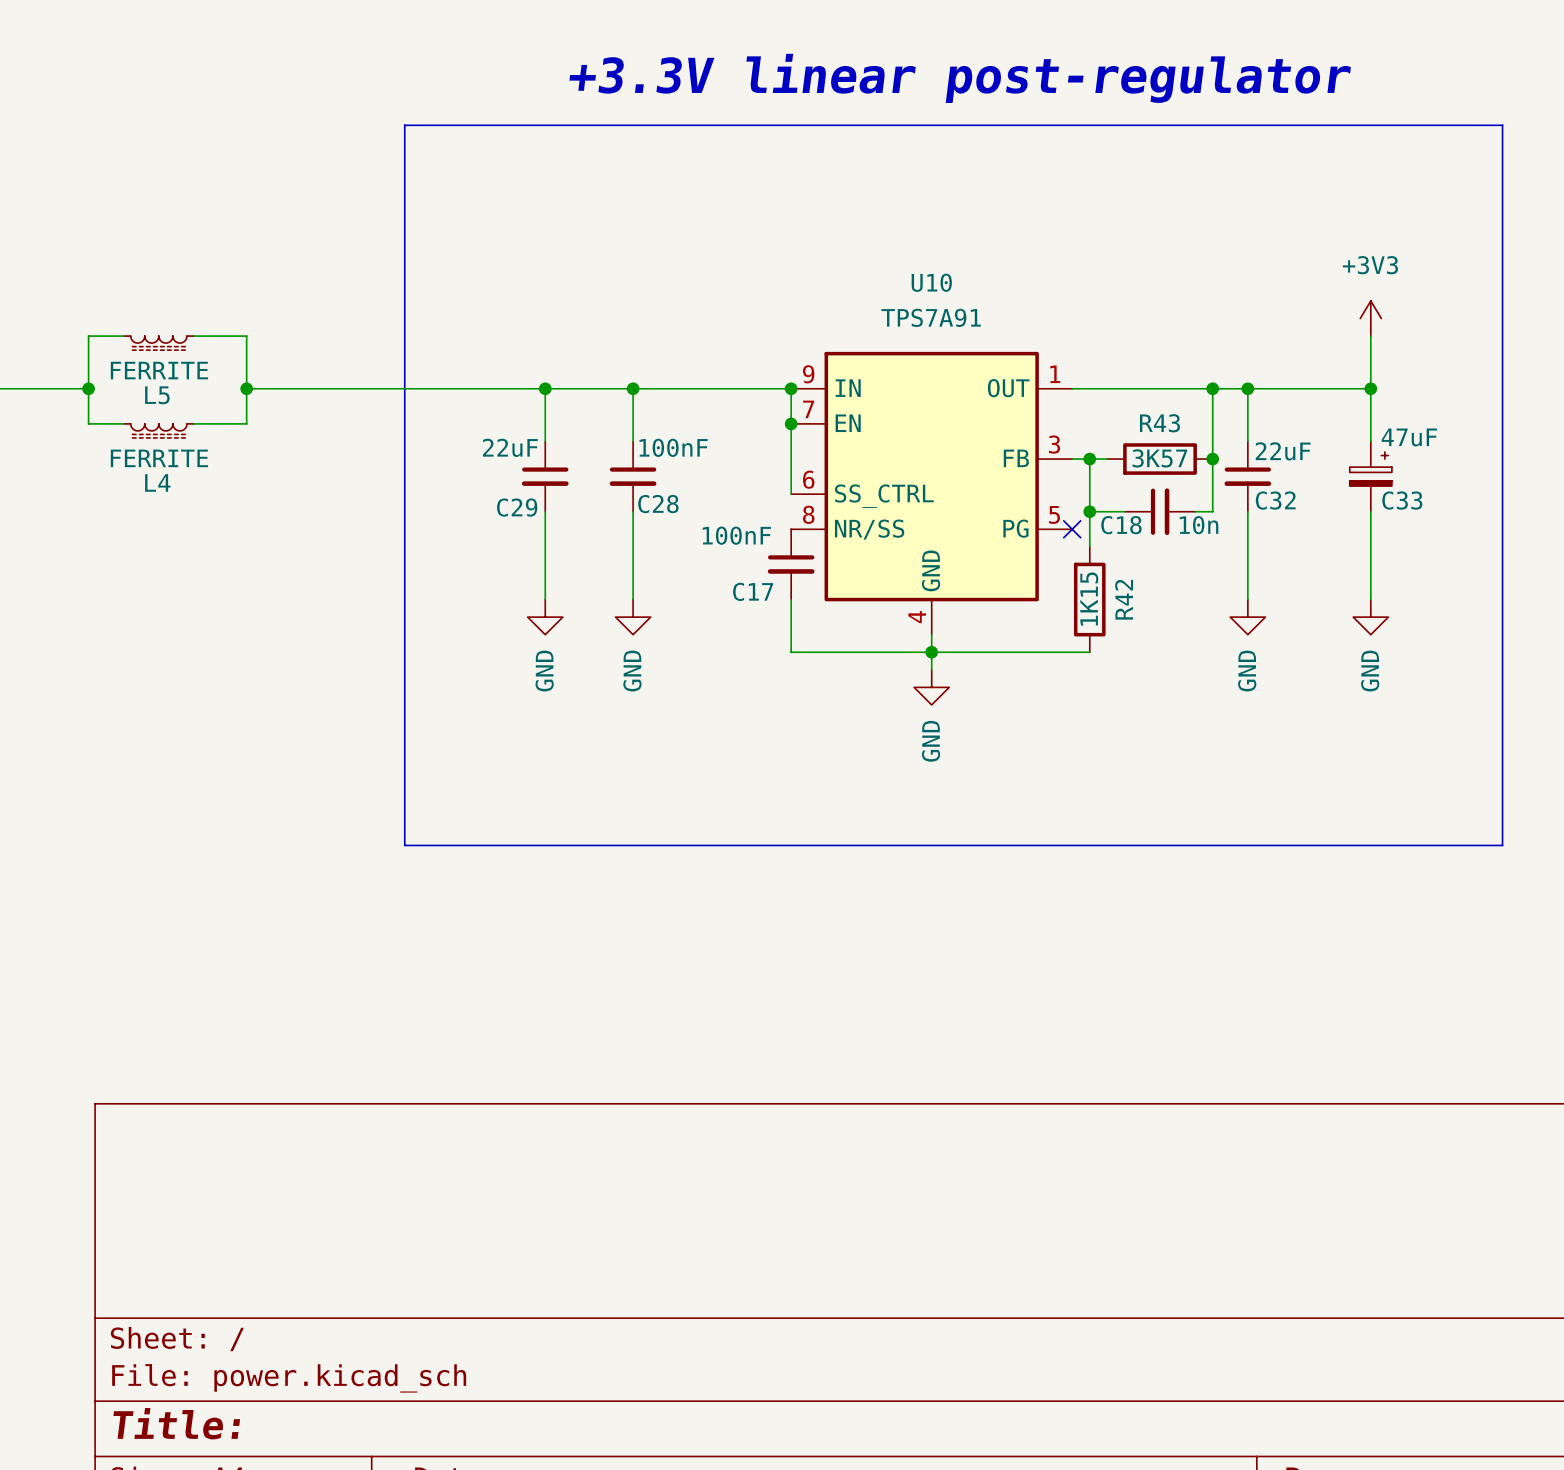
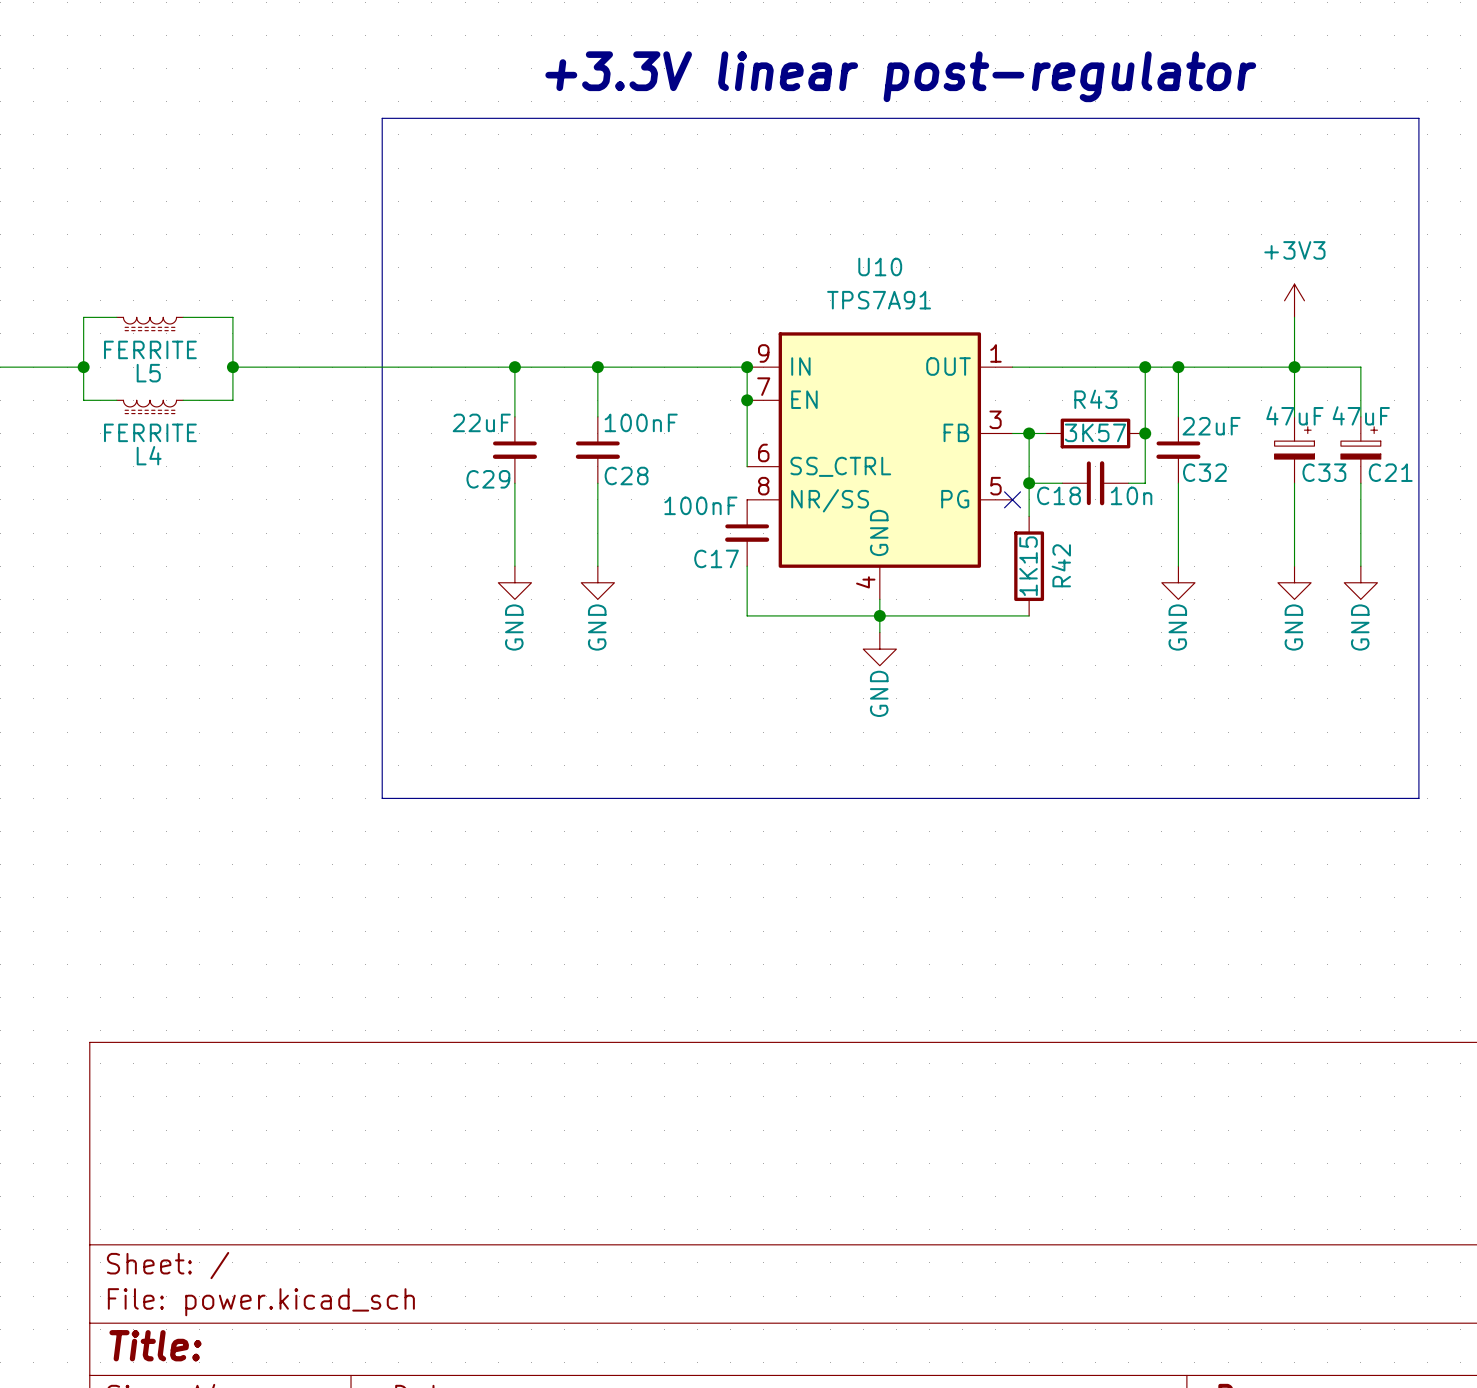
wire: none -> (1294, 367) (1360, 367) (1360, 416)
C33 value position: 47uF (1409, 437) -> 47uF (1294, 415)
C21: none -> 47uF (1360, 450)
wire: none -> (1360, 483) (1360, 566)
power symbol: none -> GND (1360, 582)

